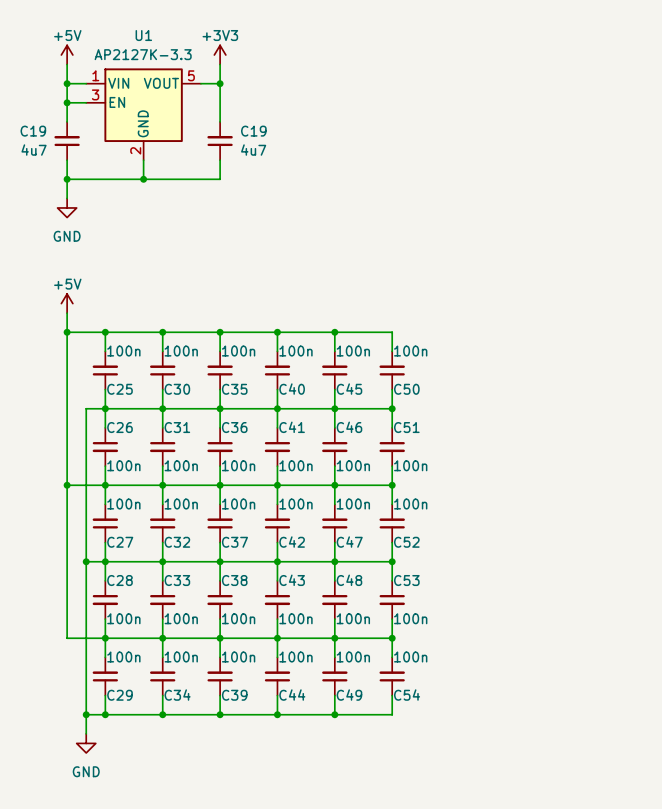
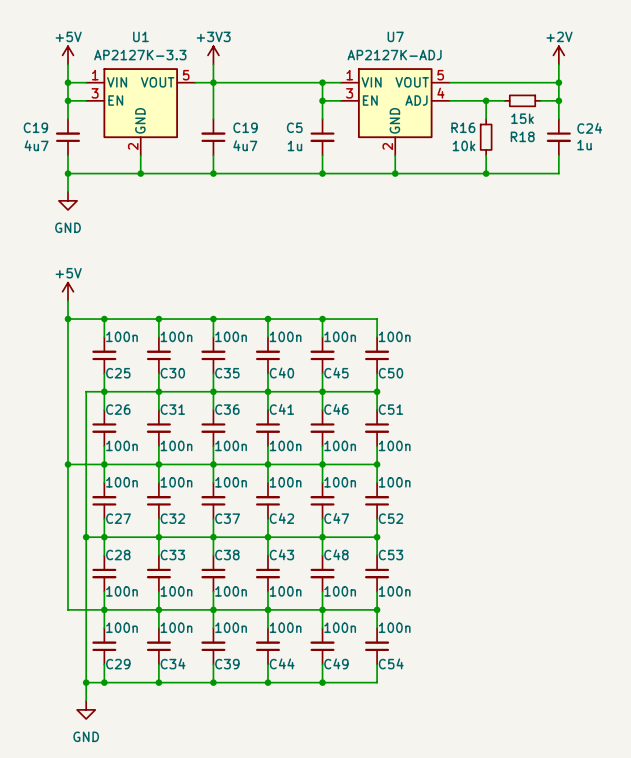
power symbol: none -> +2V (558, 55)
wire: none -> (558, 64) (558, 119)
wire: none -> (213, 82) (340, 82)
wire: none -> (322, 82) (322, 119)
junction: none -> (322, 82)
wire: none -> (449, 82) (558, 82)
junction: none -> (558, 82)
wire: none -> (322, 100) (340, 100)
junction: none -> (322, 100)
wire: none -> (449, 100) (504, 100)
wire: none -> (486, 100) (486, 119)
junction: none -> (486, 100)
R18: none -> 15k (522, 100)
wire: none -> (540, 100) (558, 100)
junction: none -> (558, 100)
U7: none -> AP2127K-ADJ (395, 111)
C5: none -> 1u (322, 137)
R16: none -> 10k (486, 137)
C24: none -> 1u (558, 137)
wire: none -> (322, 155) (322, 173)
wire: none -> (395, 155) (395, 173)
wire: none -> (486, 155) (486, 173)
wire: none -> (558, 155) (558, 173) (213, 173)
junction: none -> (213, 173)
junction: none -> (322, 173)
junction: none -> (395, 173)
junction: none -> (486, 173)

